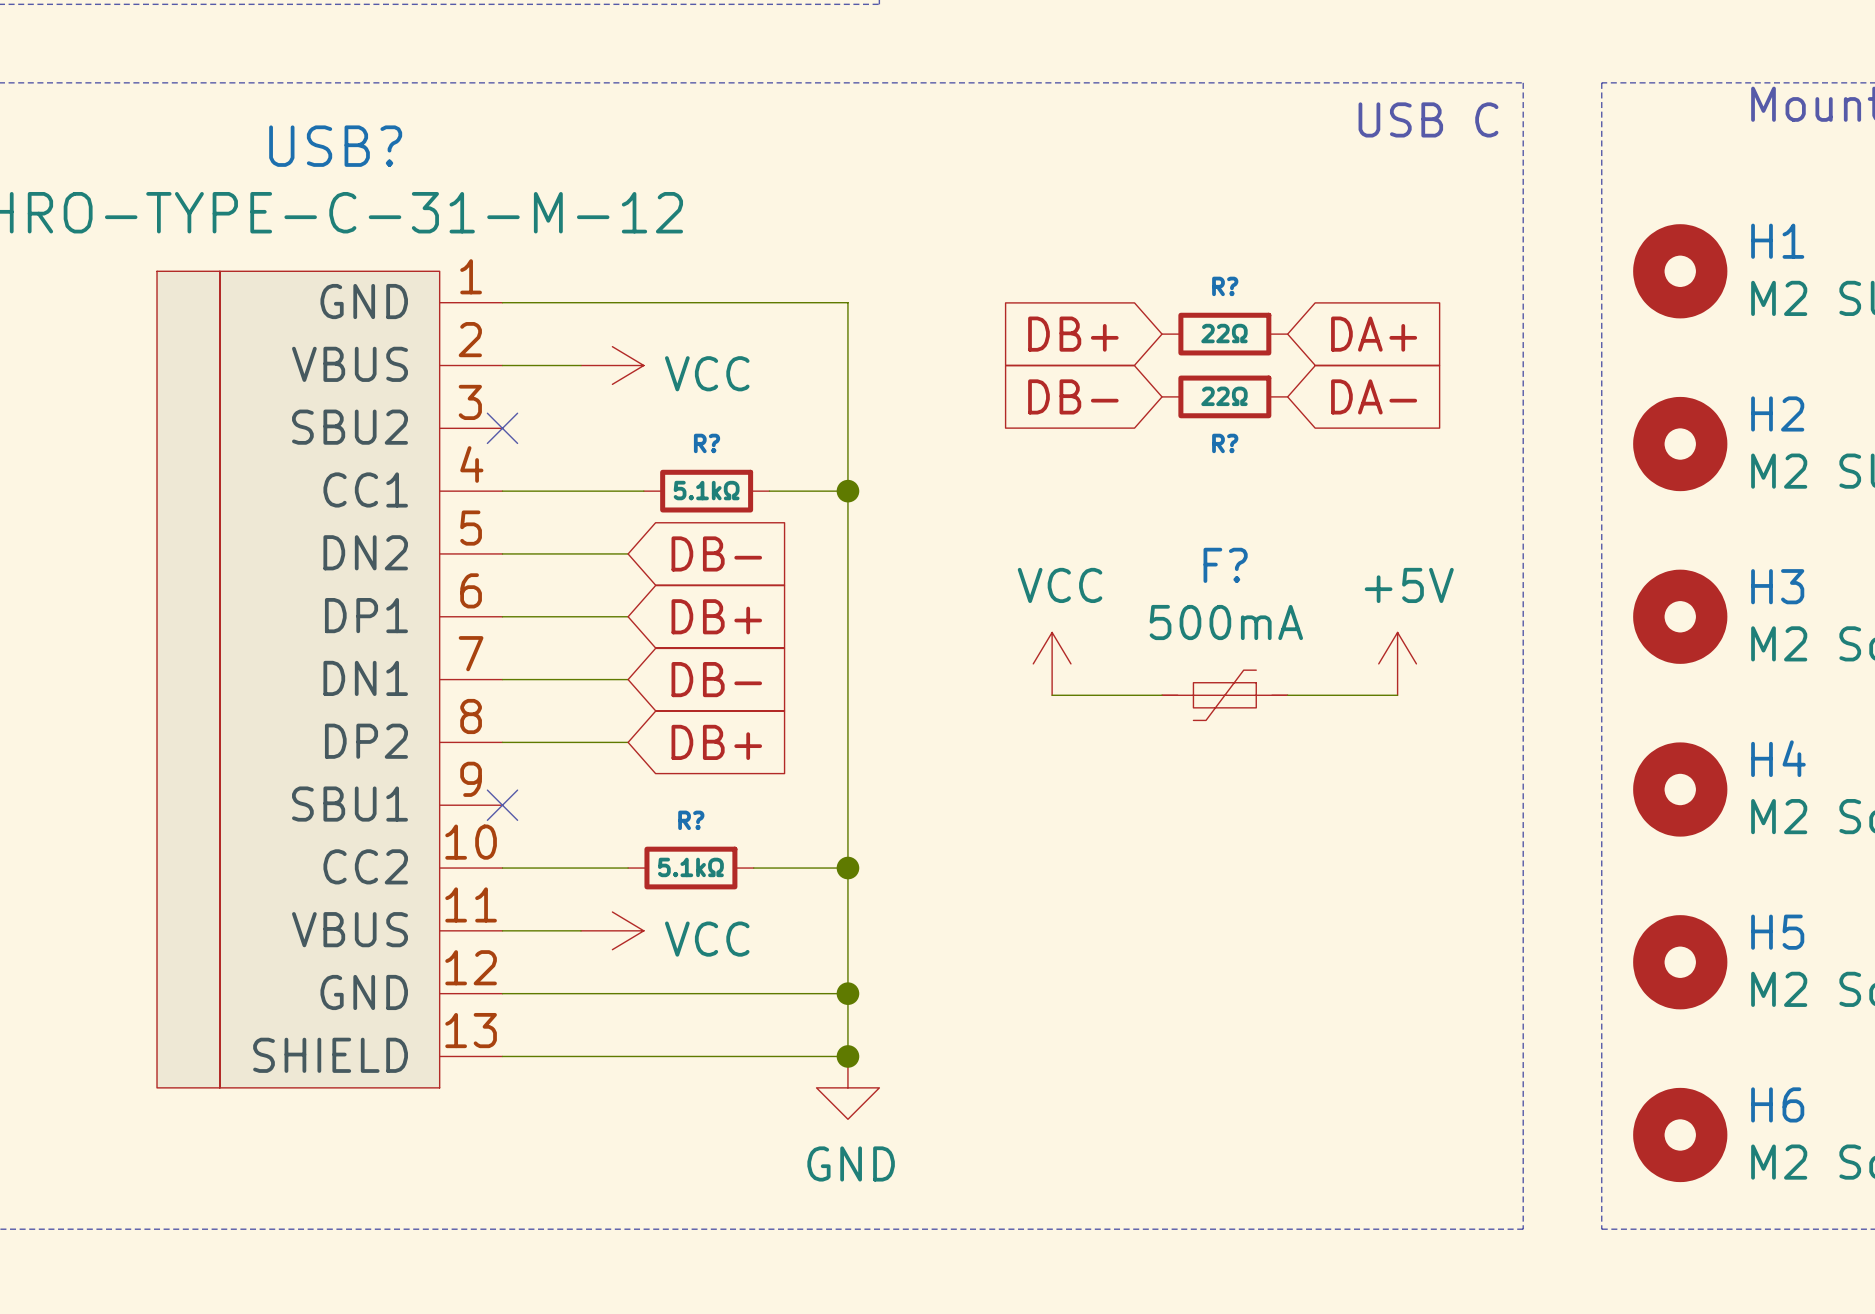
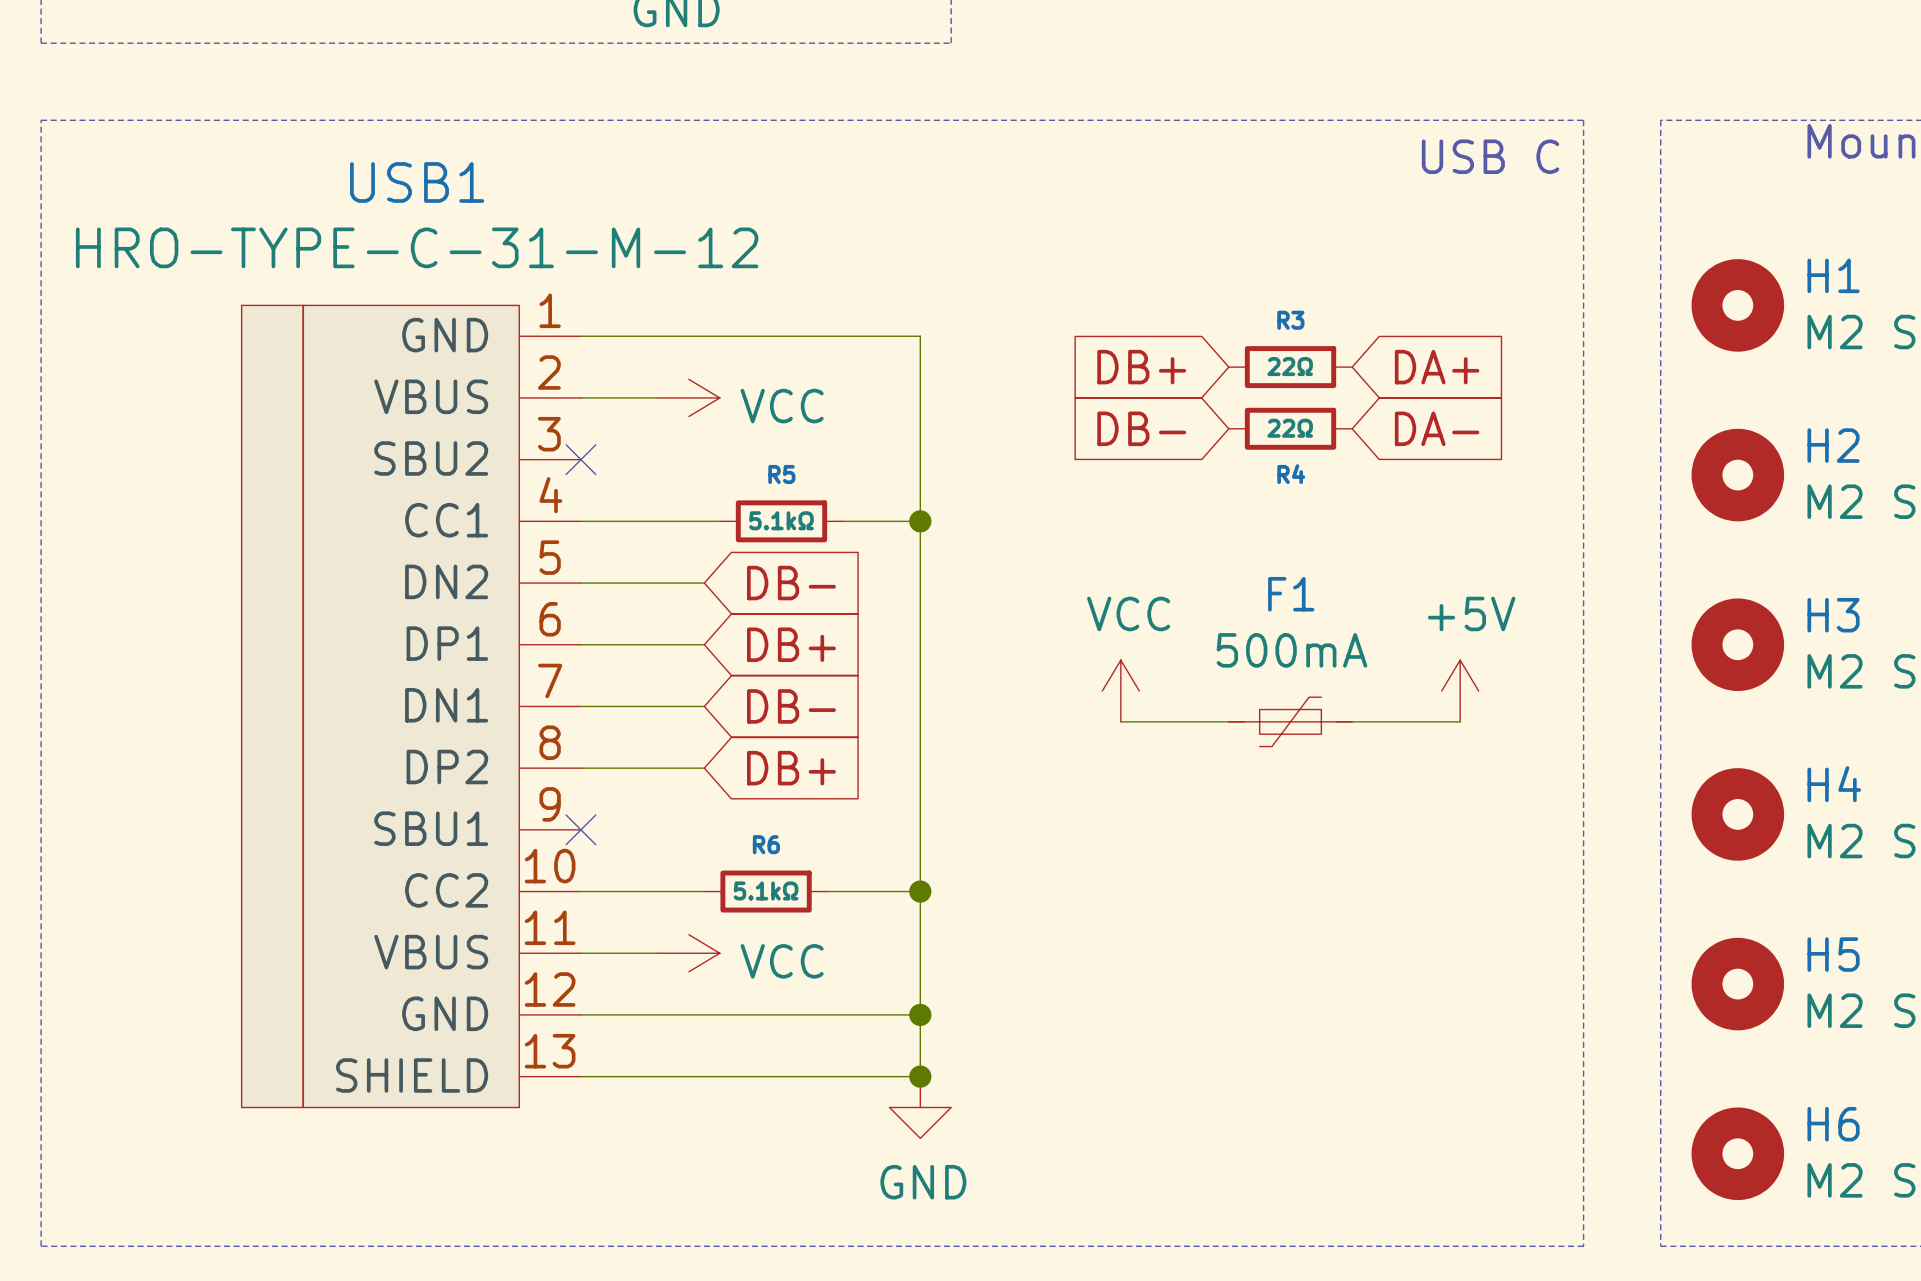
USB? name: USB? (335, 146) -> USB1 (417, 182)
R? name: R? (1225, 286) -> R3 (1290, 320)
R? name: R? (707, 443) -> R5 (781, 474)
R? name: R? (1225, 443) -> R4 (1291, 474)
F? name: F? (1225, 565) -> F1 (1291, 594)
R? name: R? (691, 820) -> R6 (766, 844)

